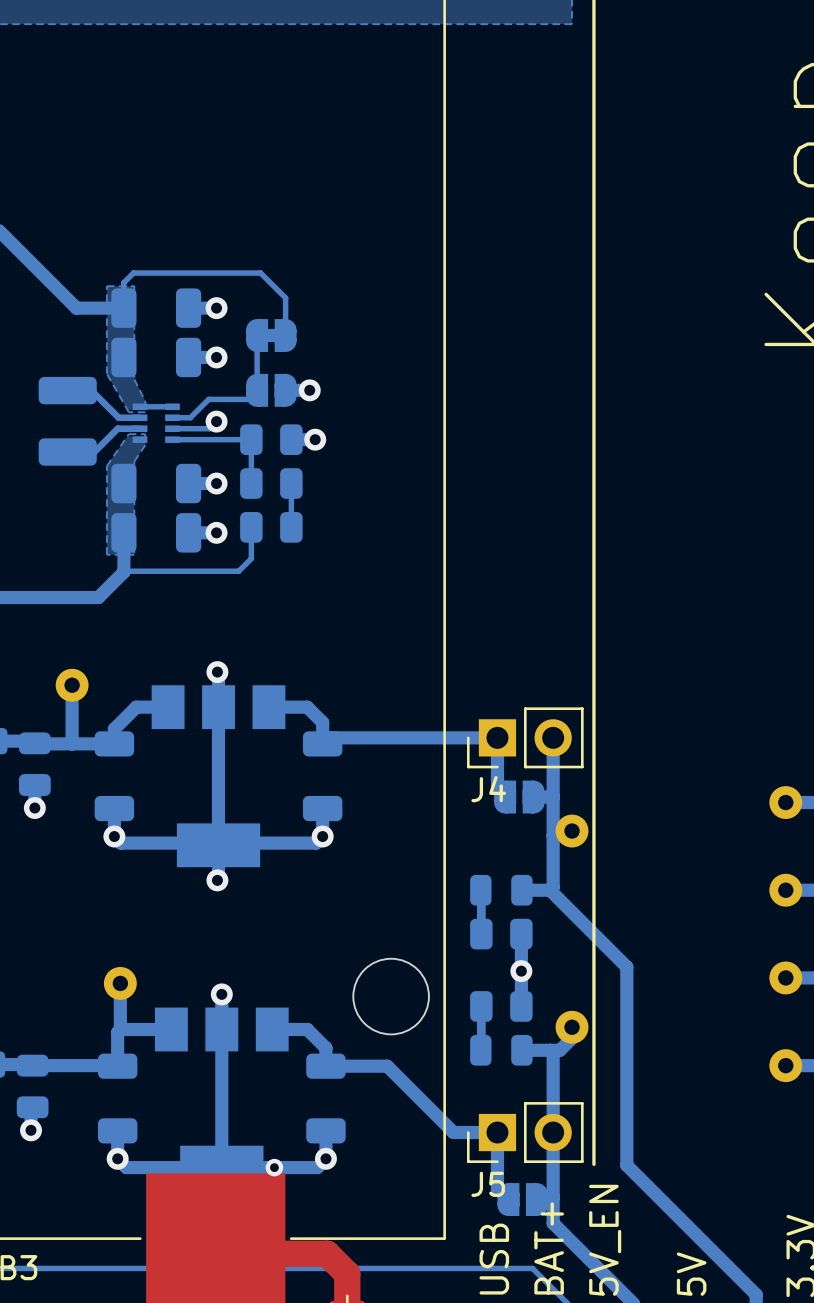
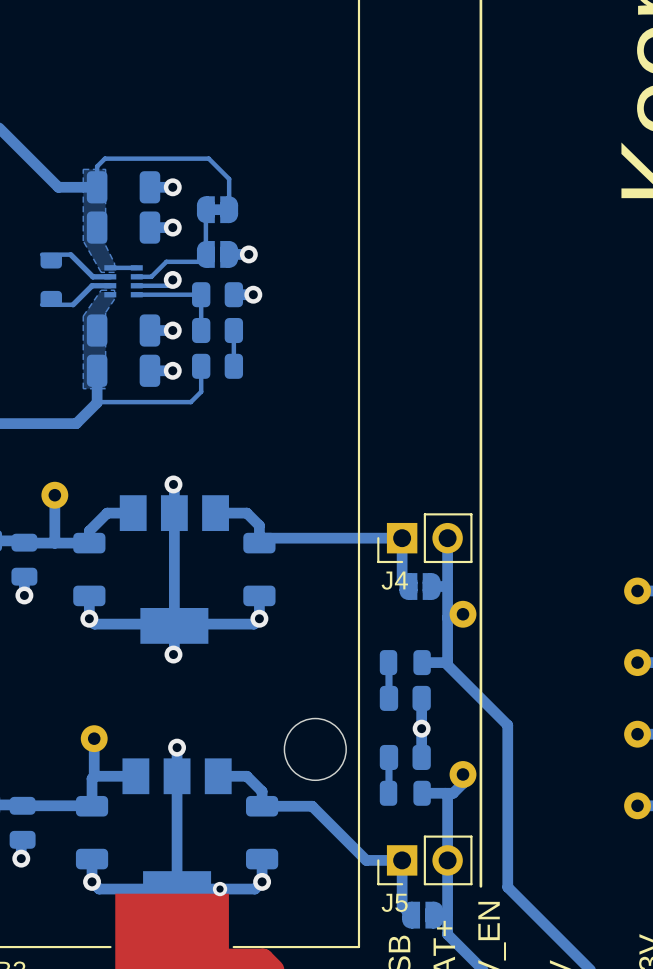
part footprint: [38, 376, 97, 466] -> [40, 252, 63, 307]

